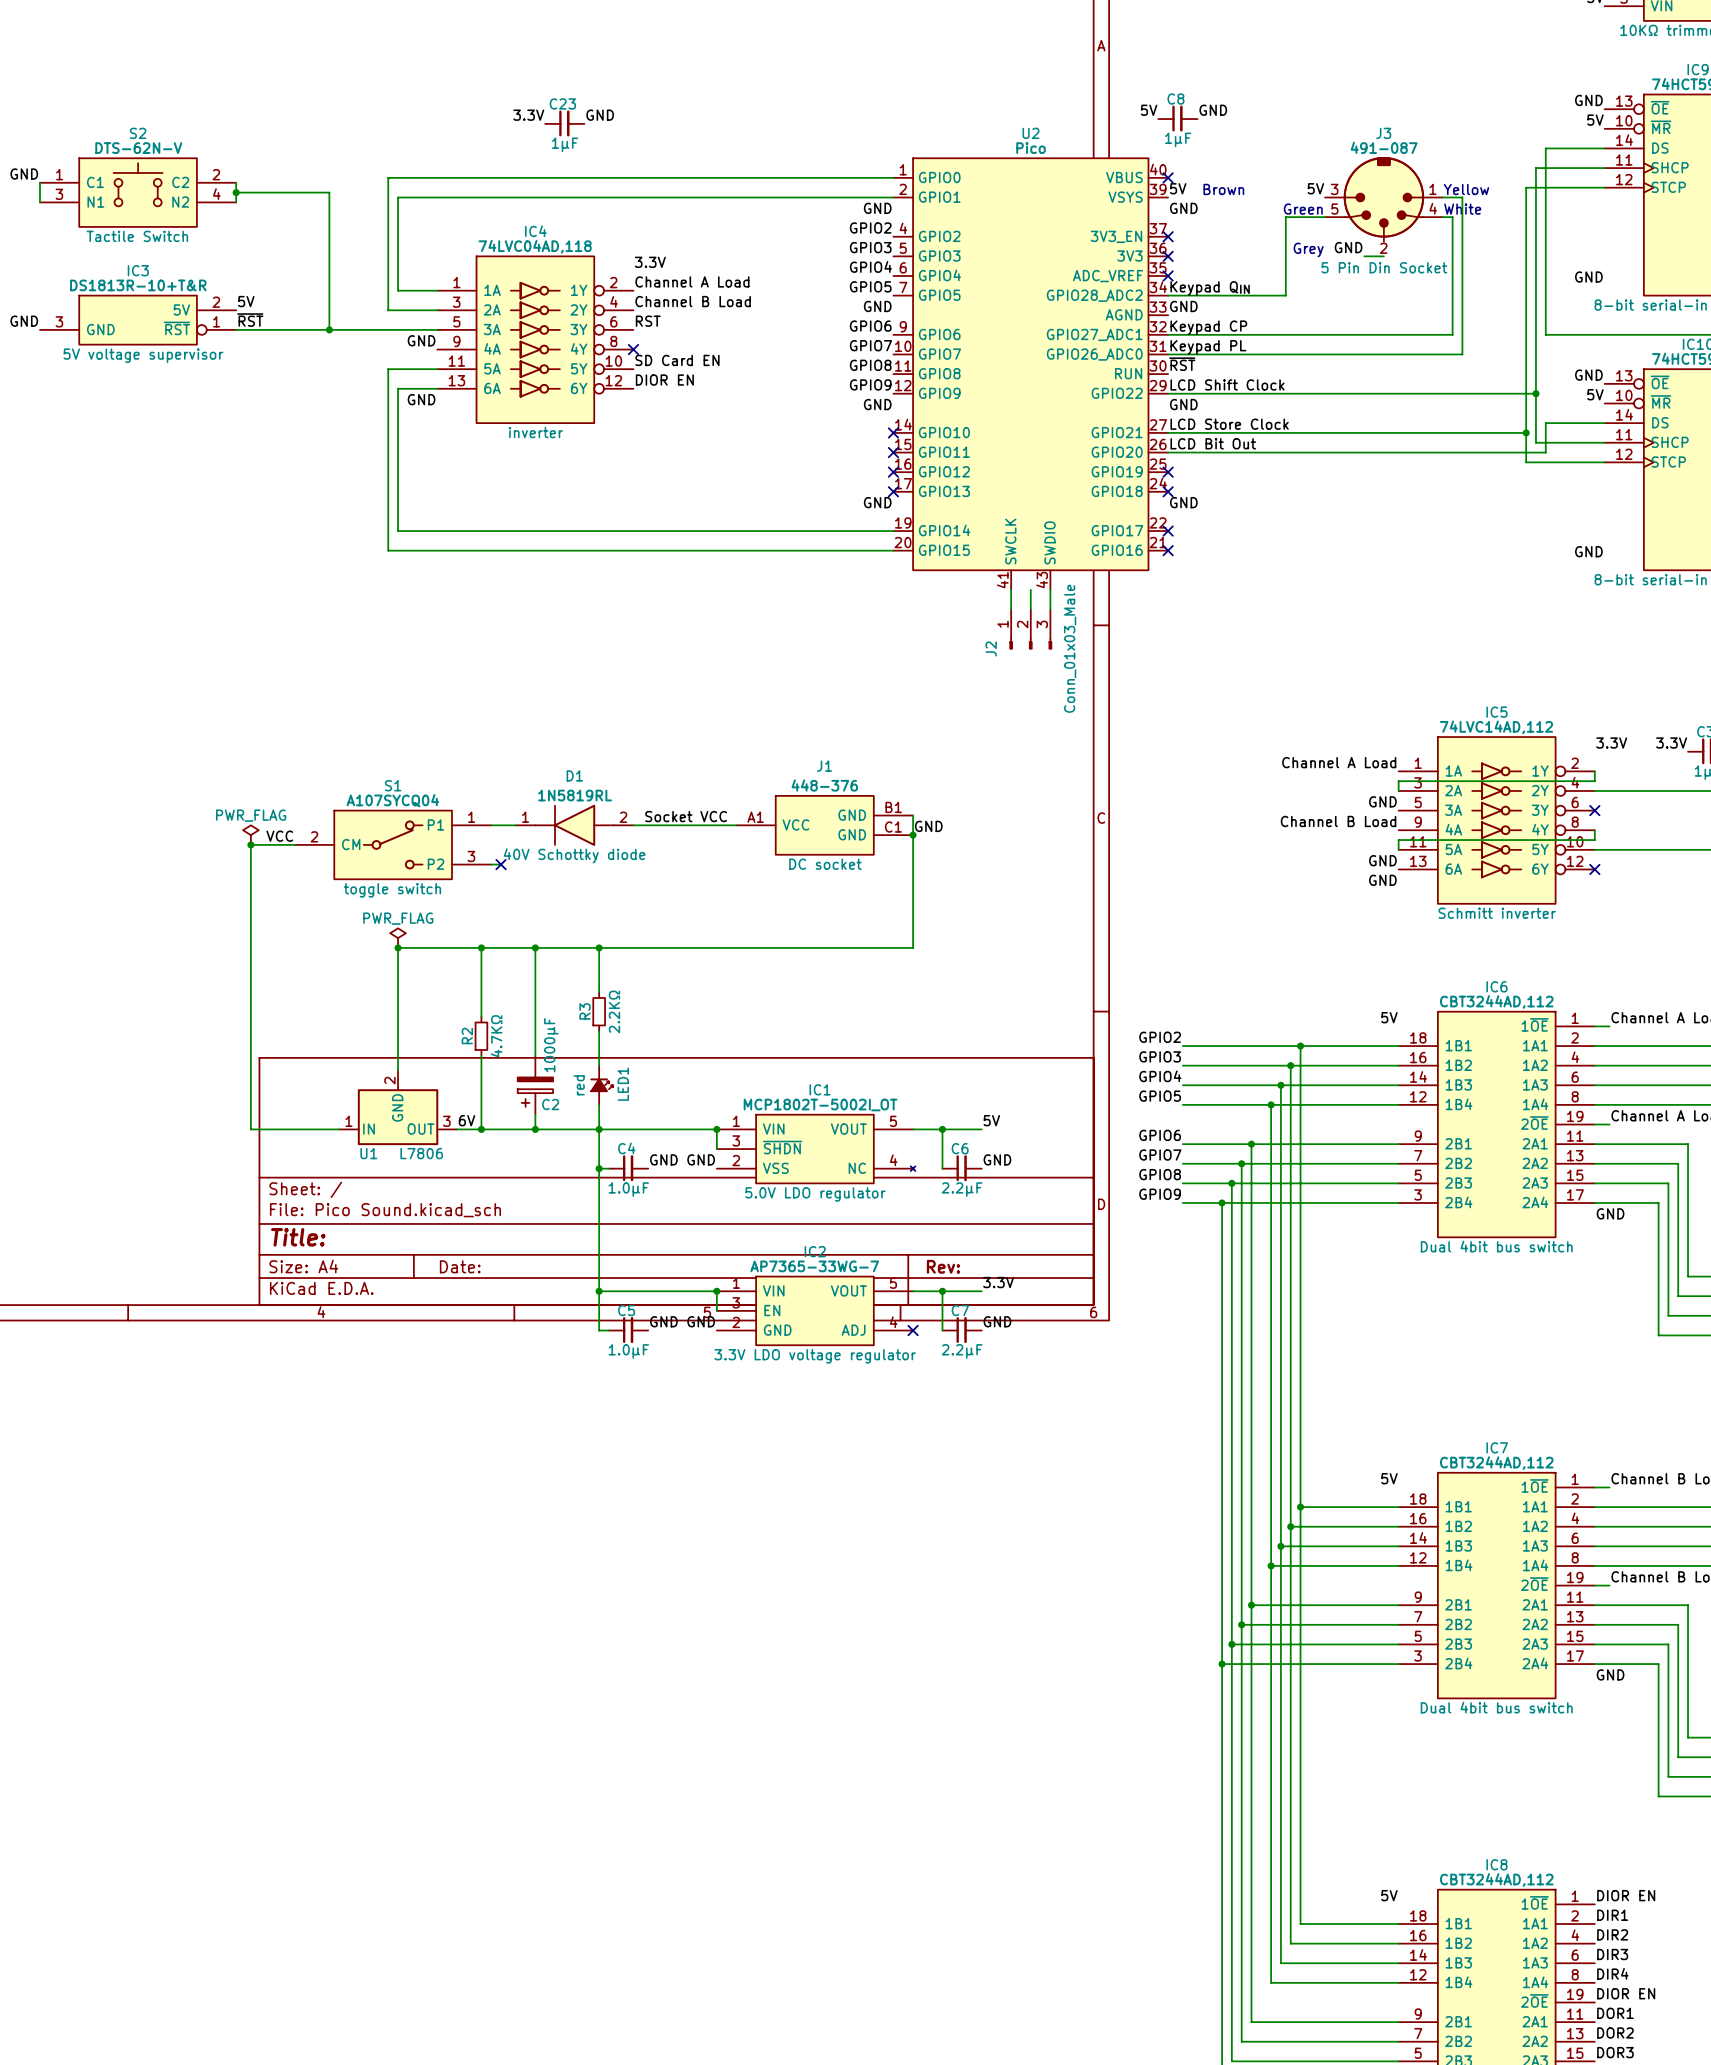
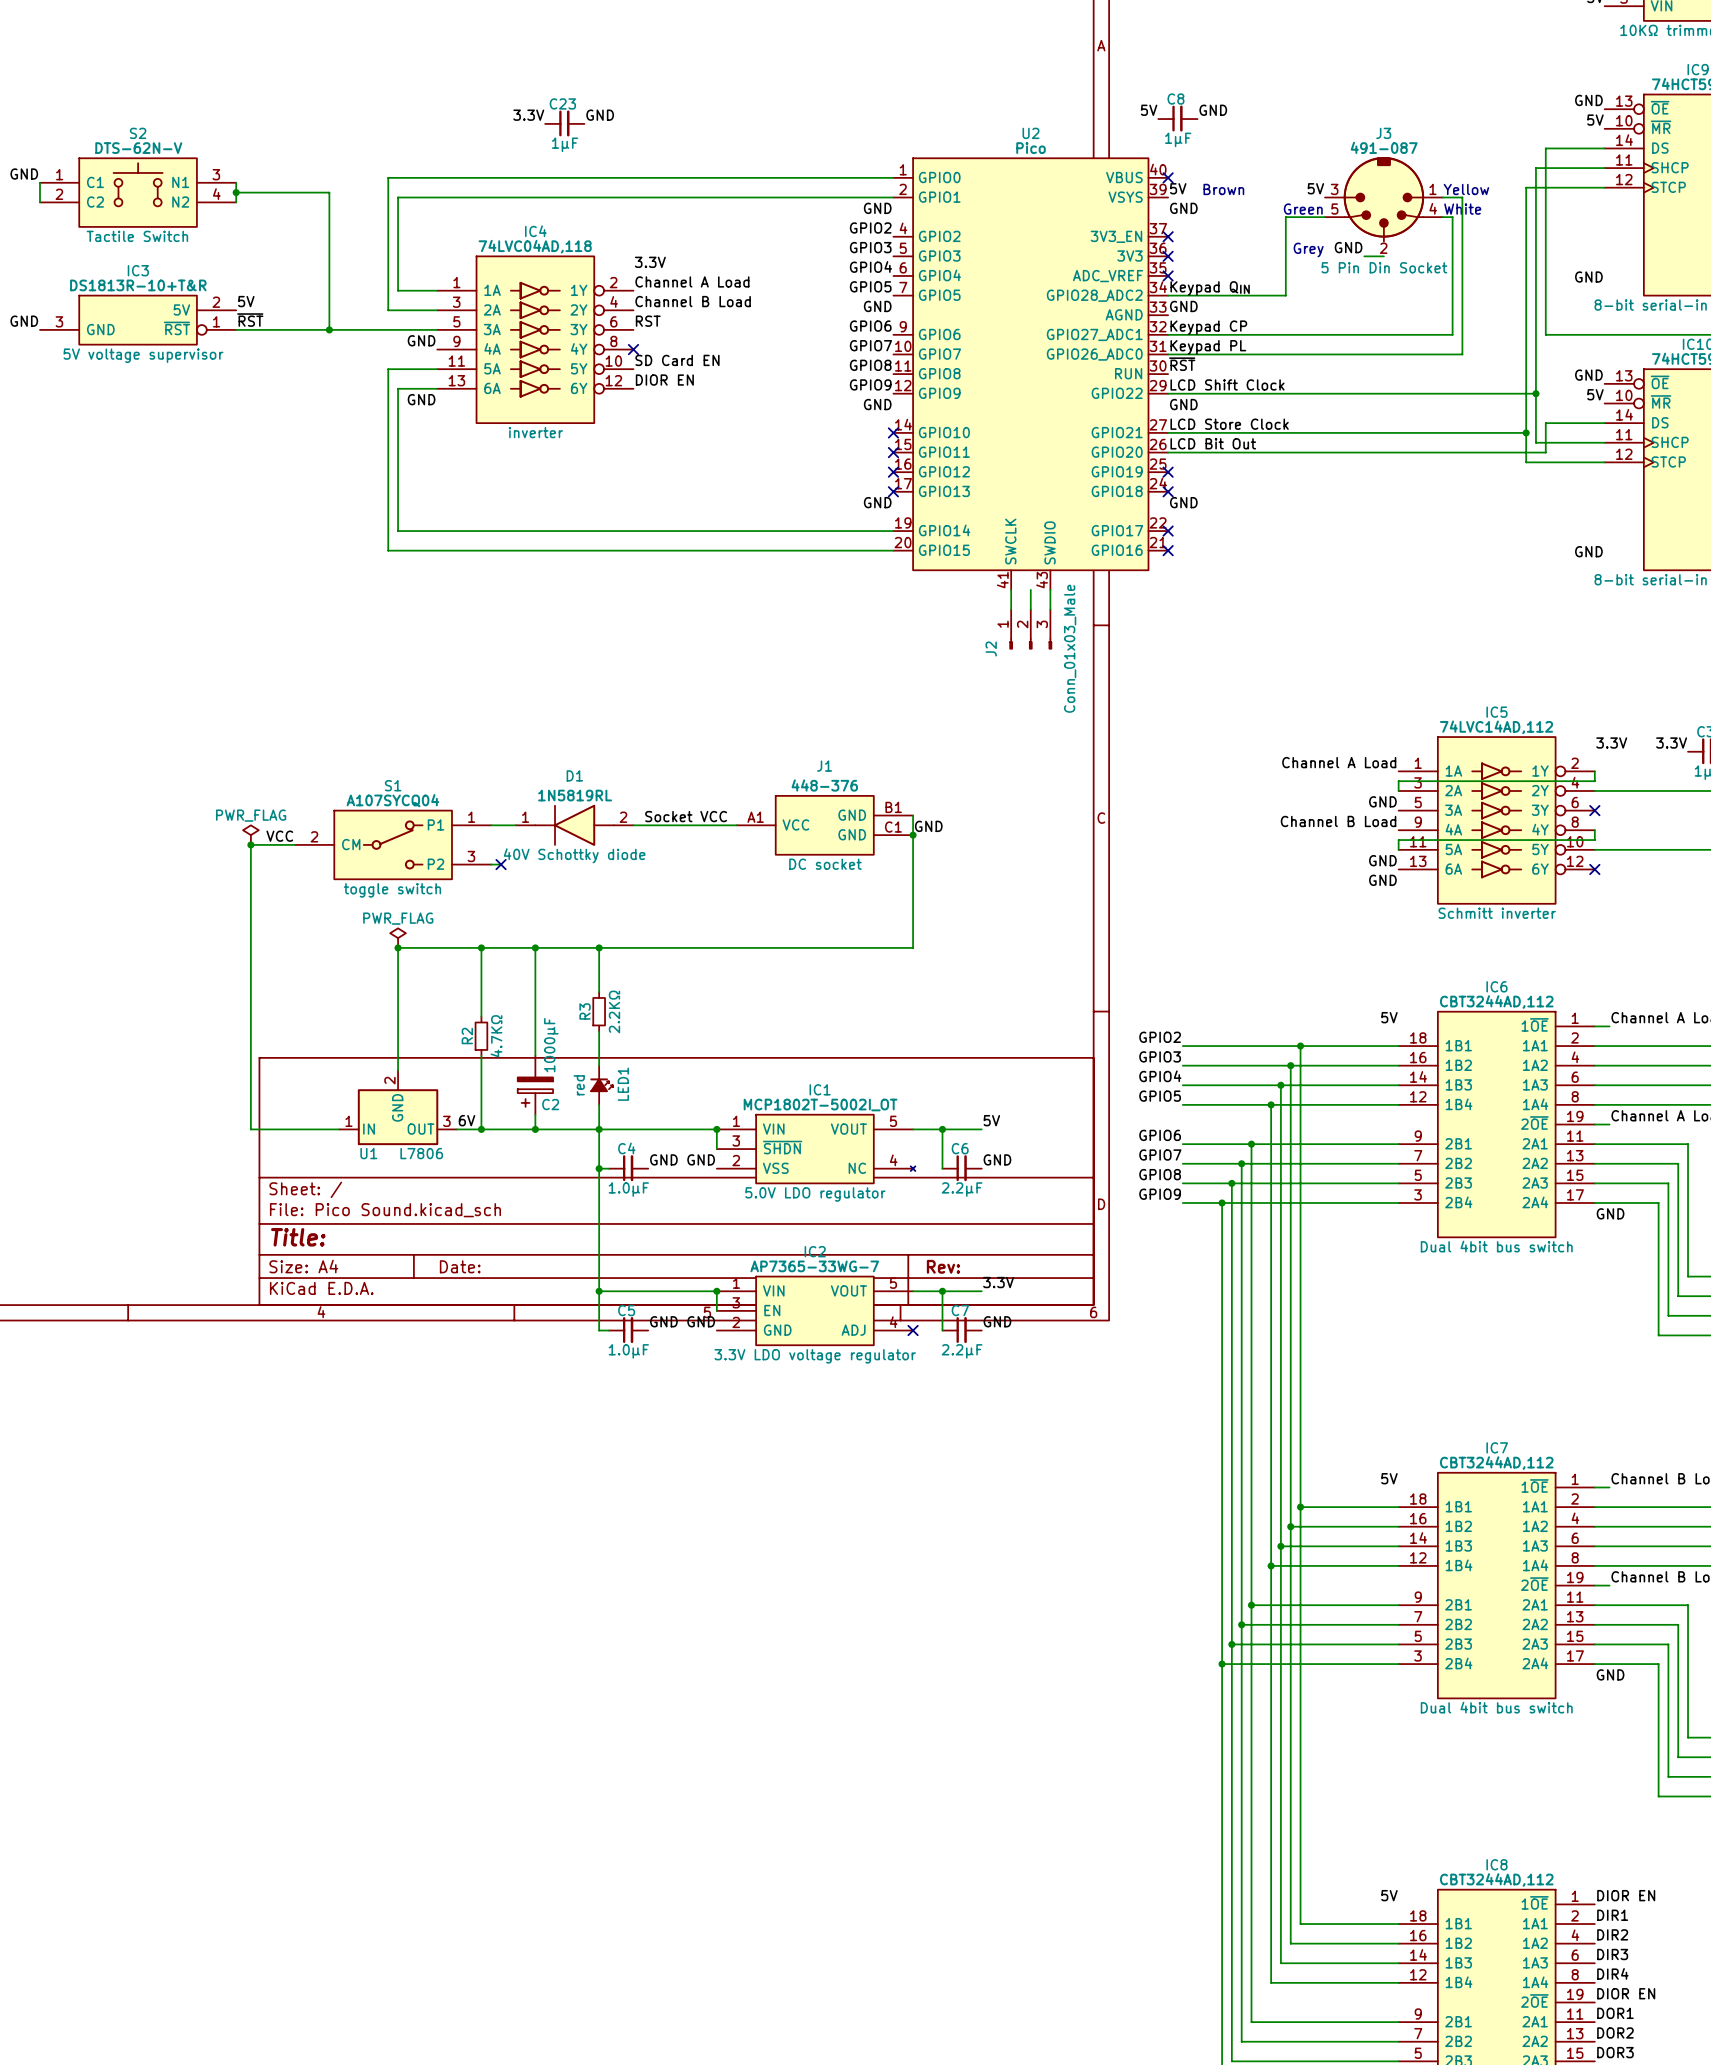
S2 pin number: 2 (216, 174) -> 3 (216, 174)
S2 pin name: C2 (180, 182) -> N1 (180, 182)
S2 pin number: 3 (59, 194) -> 2 (59, 194)
S2 pin name: N1 (95, 202) -> C2 (95, 202)

